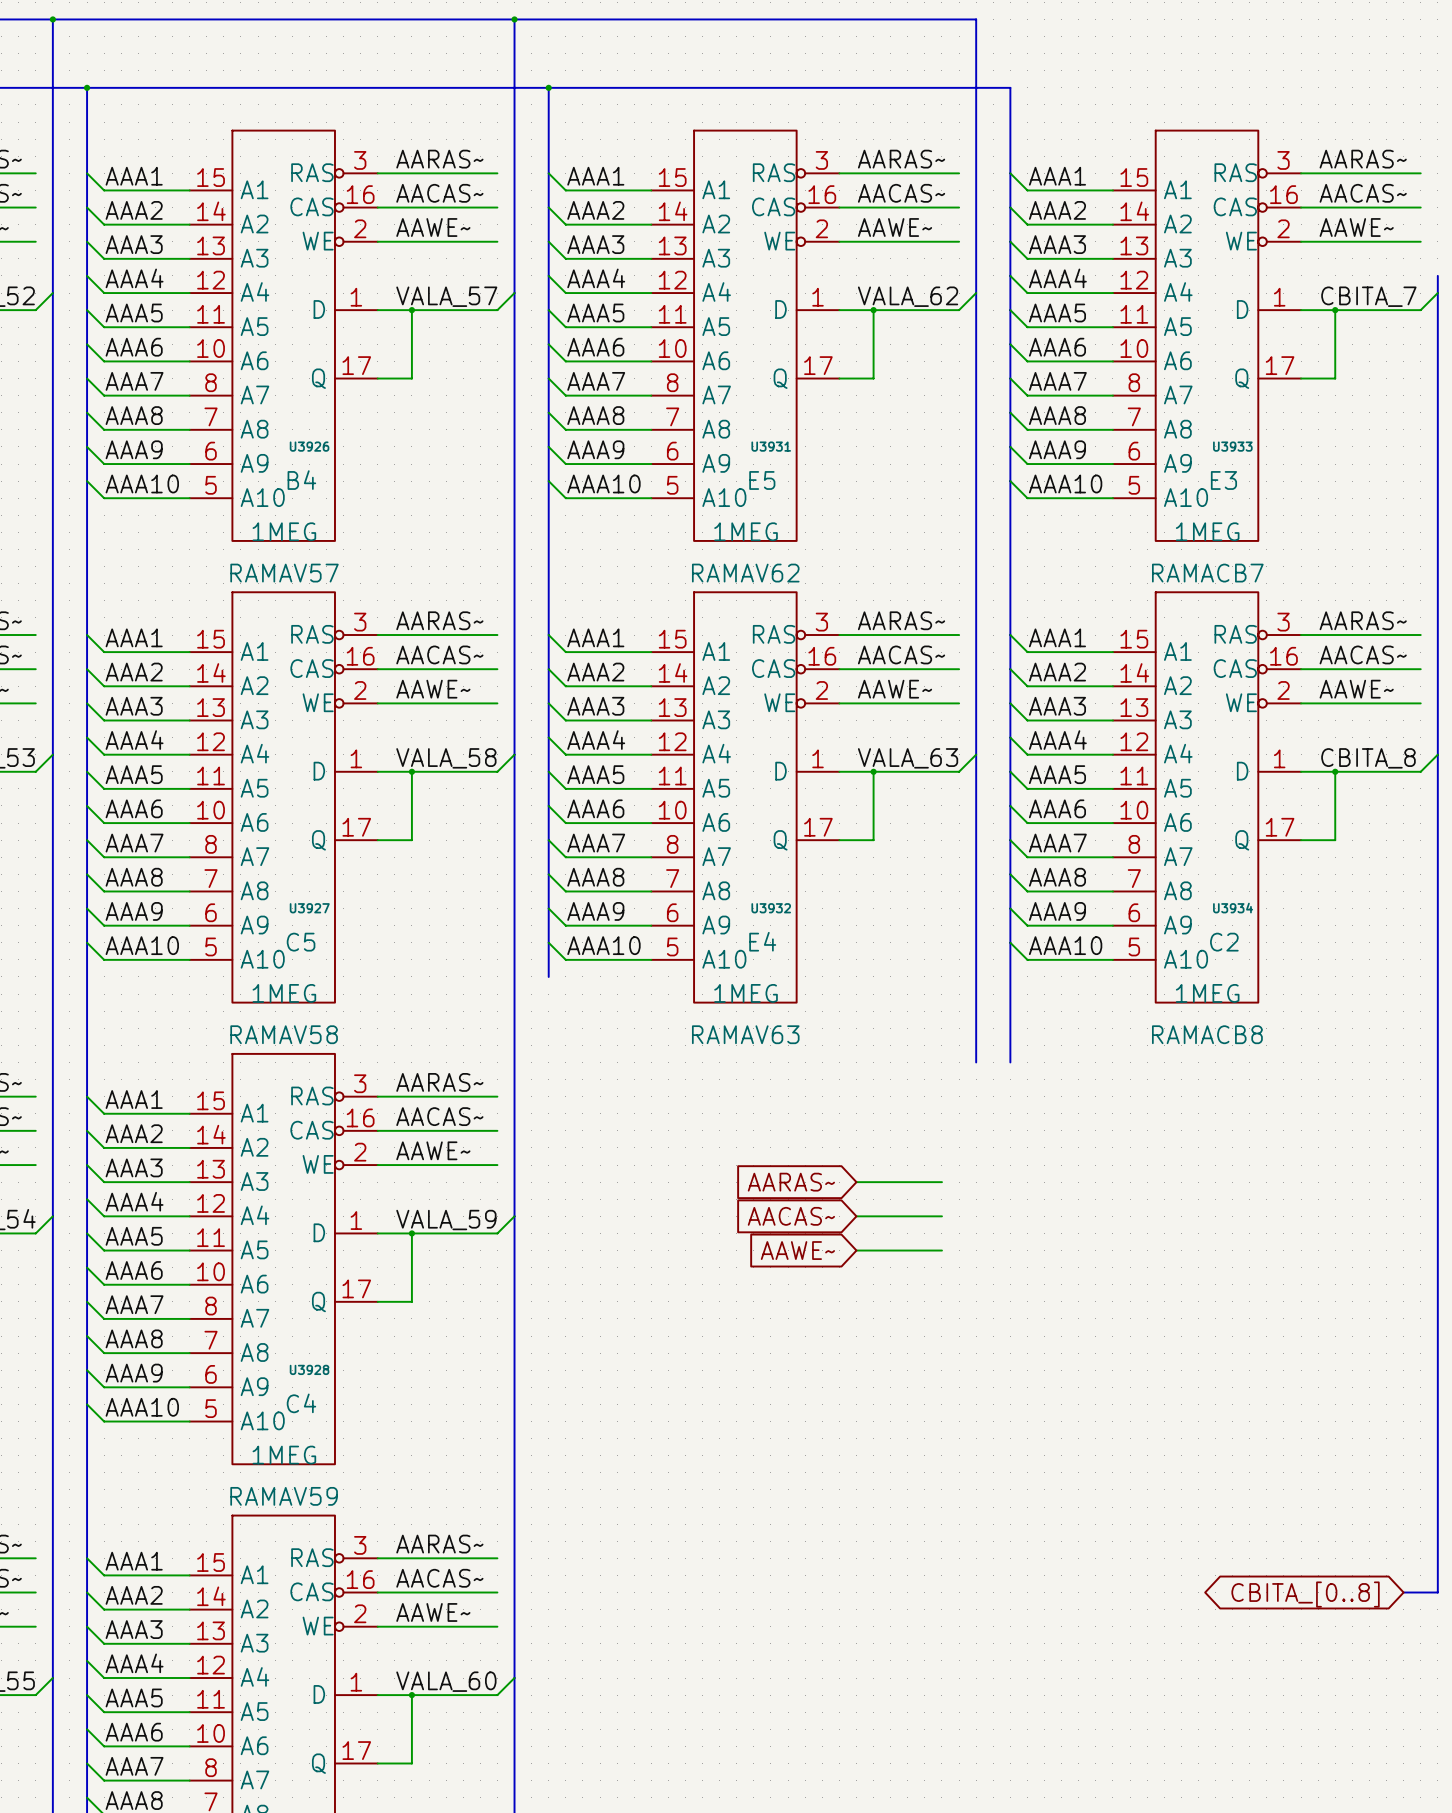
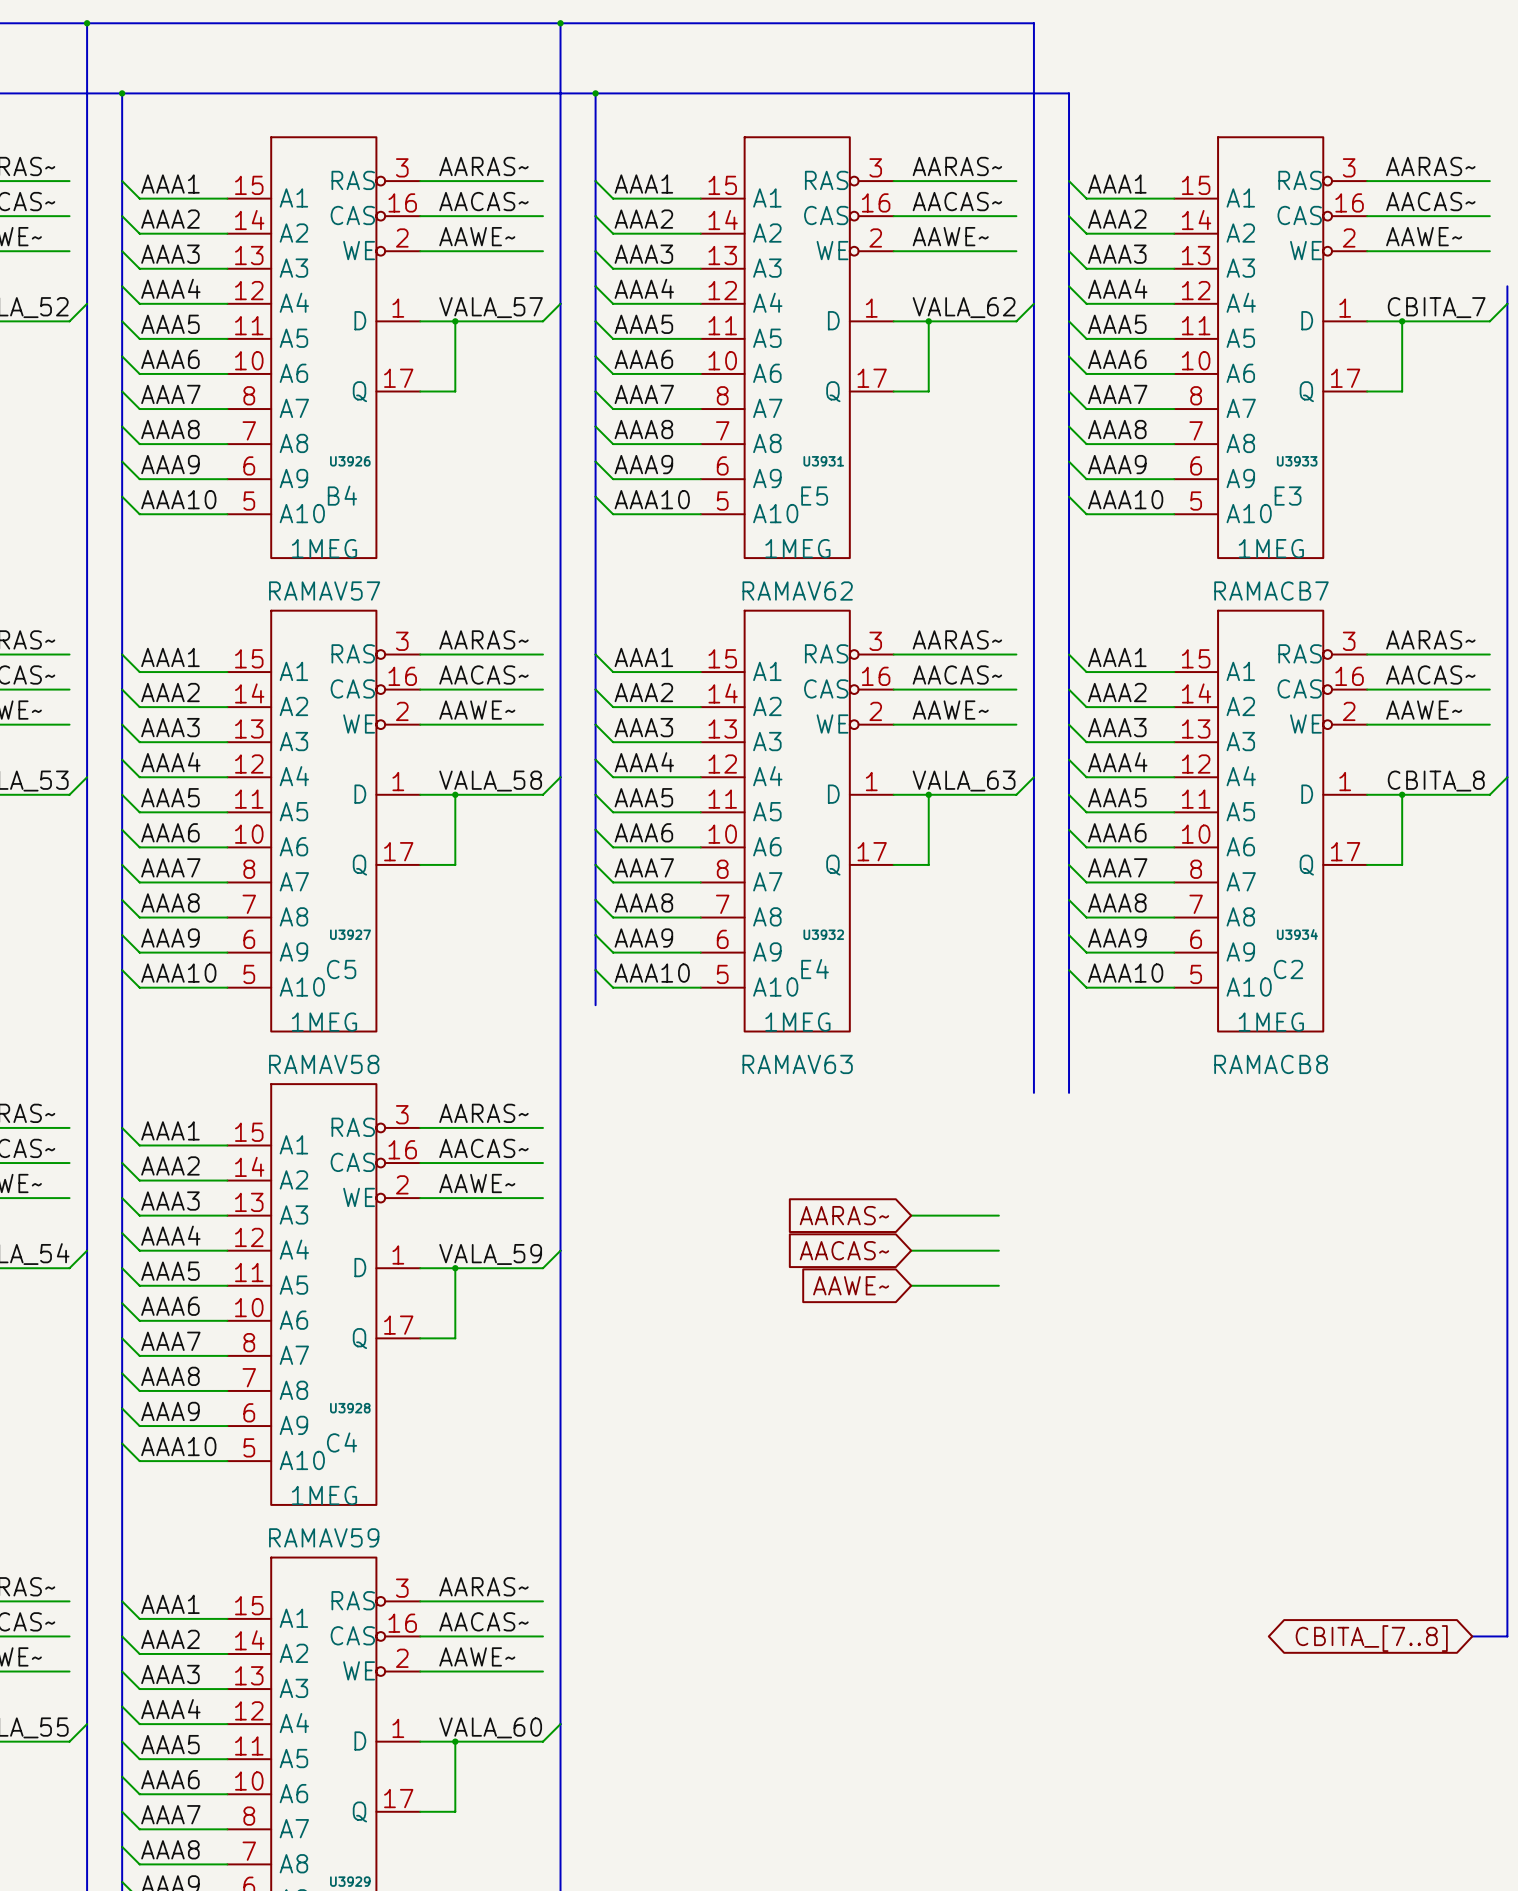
global label: CBITA_[0..8] (1305, 1594) -> CBITA_[7..8] (1371, 1638)

